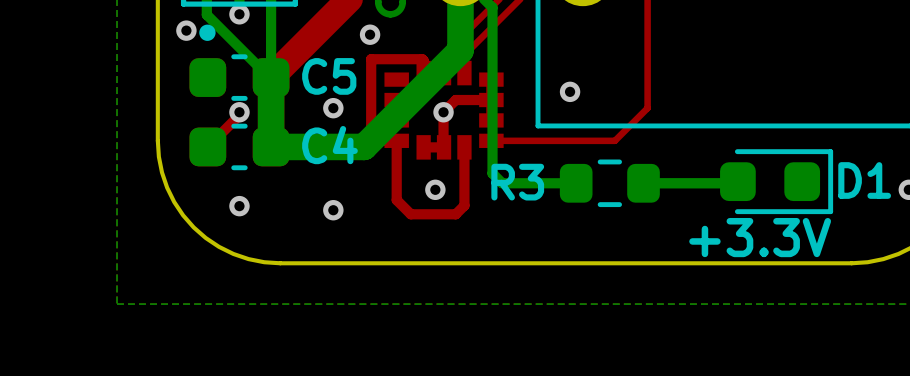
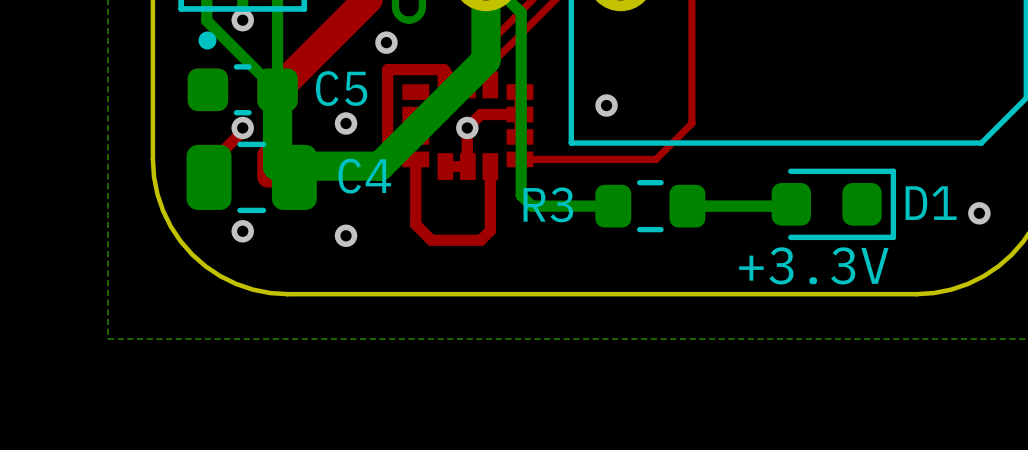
via: (186, 30) -> none
C4 footprint: [189, 123, 290, 171] -> [186, 141, 317, 214]
C4 name position: C4 (329, 145) -> C4 (364, 176)
via: (435, 189) -> none

